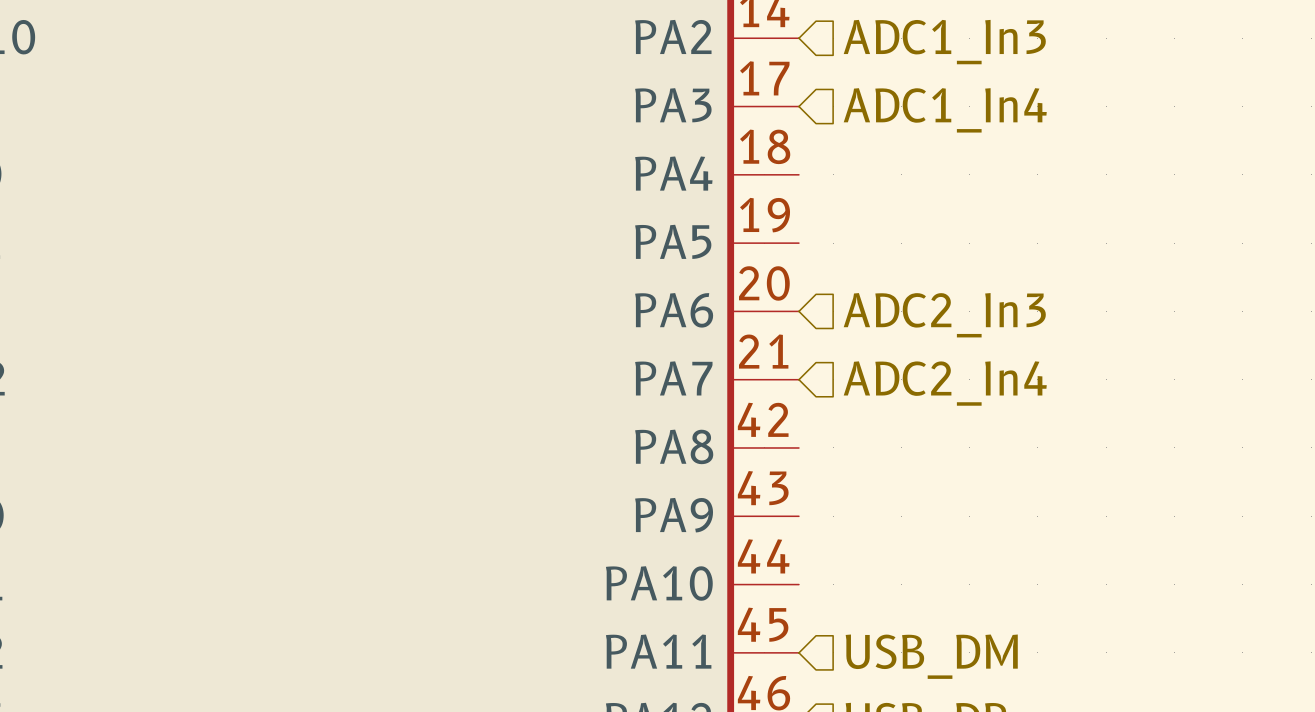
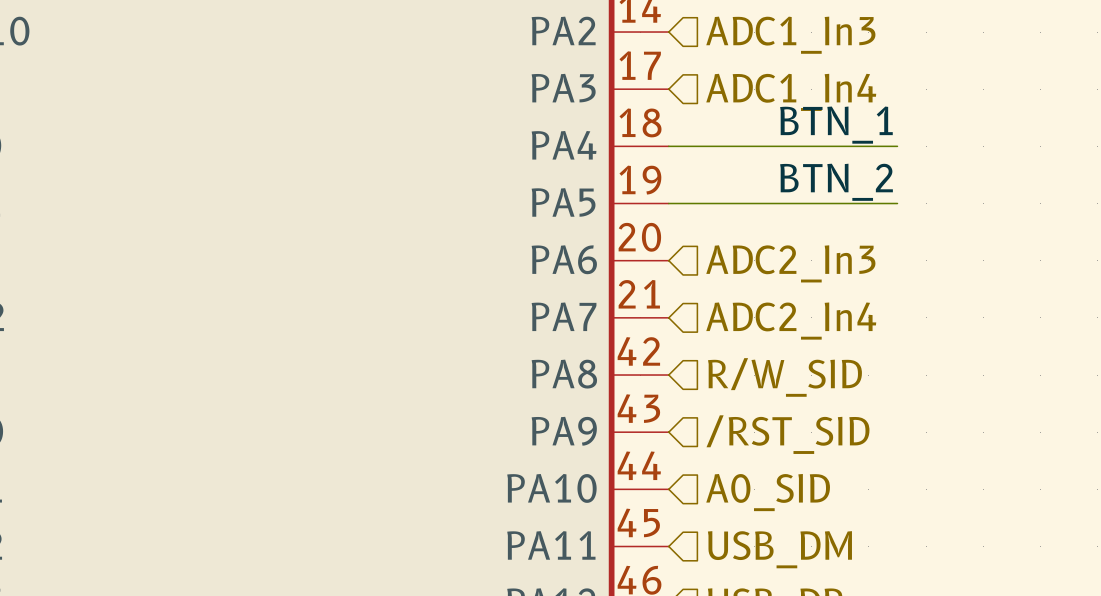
label: none -> BTN_1 (836, 125)
wire: none -> (668, 146) (897, 146)
label: none -> BTN_2 (836, 182)
wire: none -> (668, 203) (897, 203)
hierarchical label: none -> R/W_SID (784, 377)
hierarchical label: none -> /RST_SID (787, 434)
hierarchical label: none -> A0_SID (768, 492)

